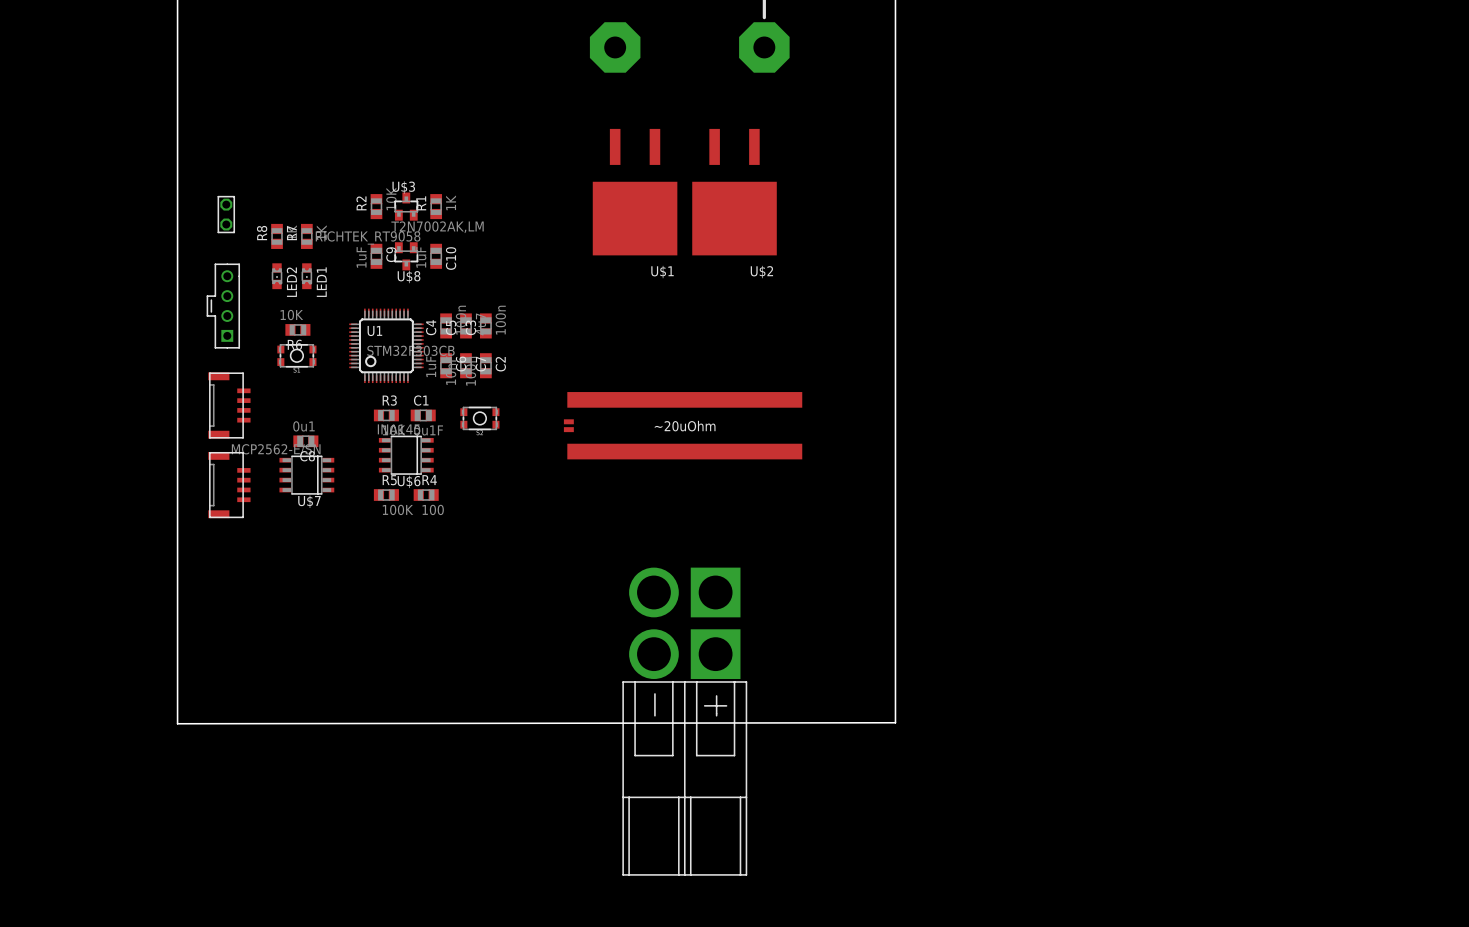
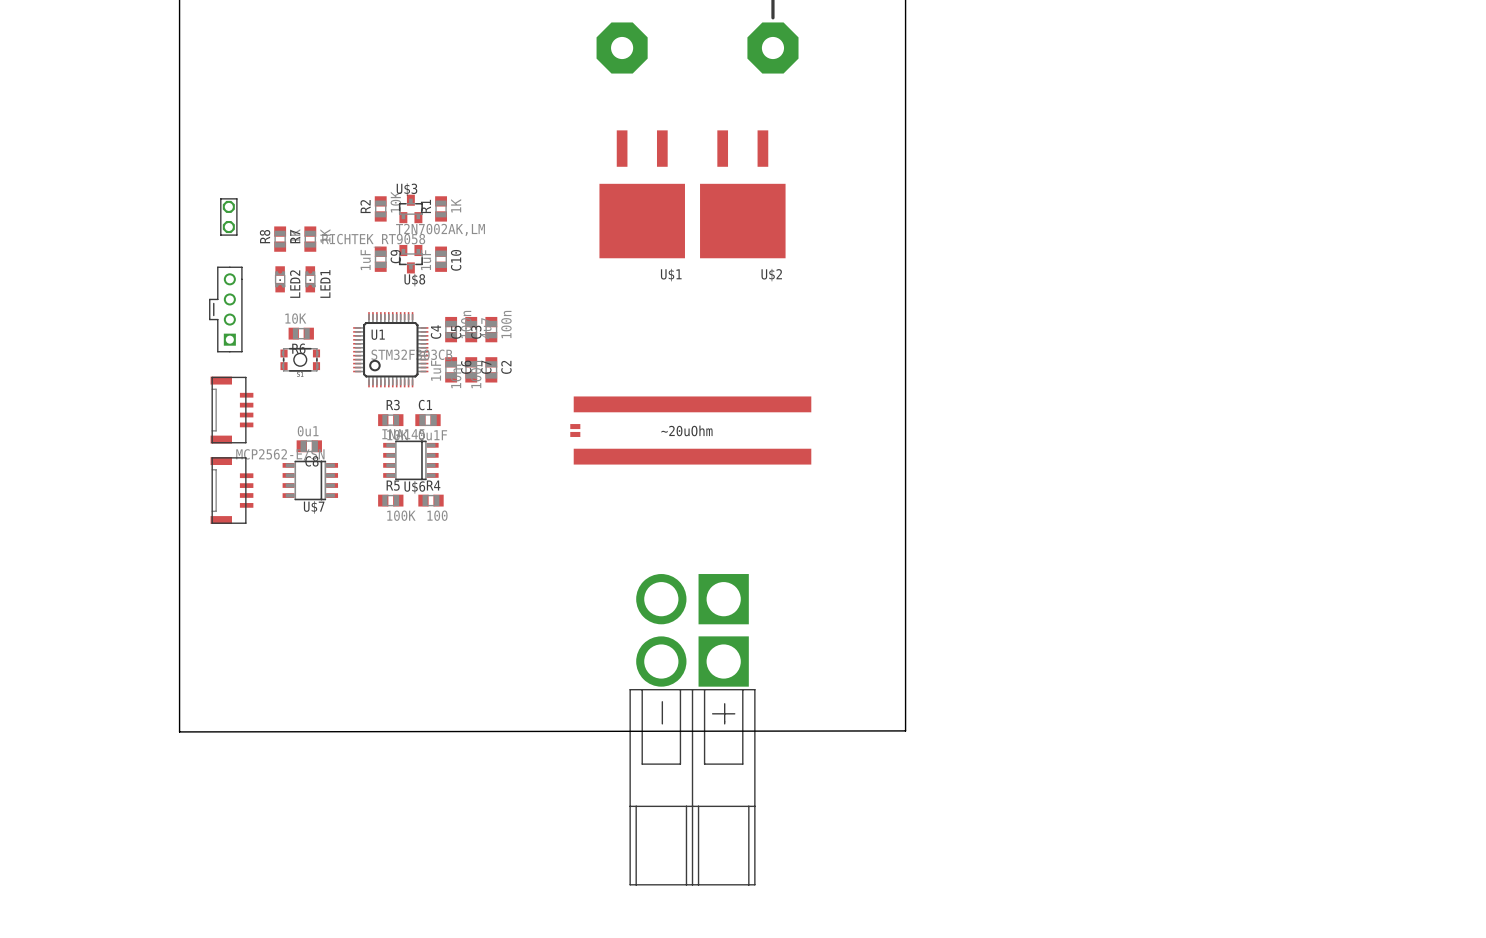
part: (479, 418) -> none

